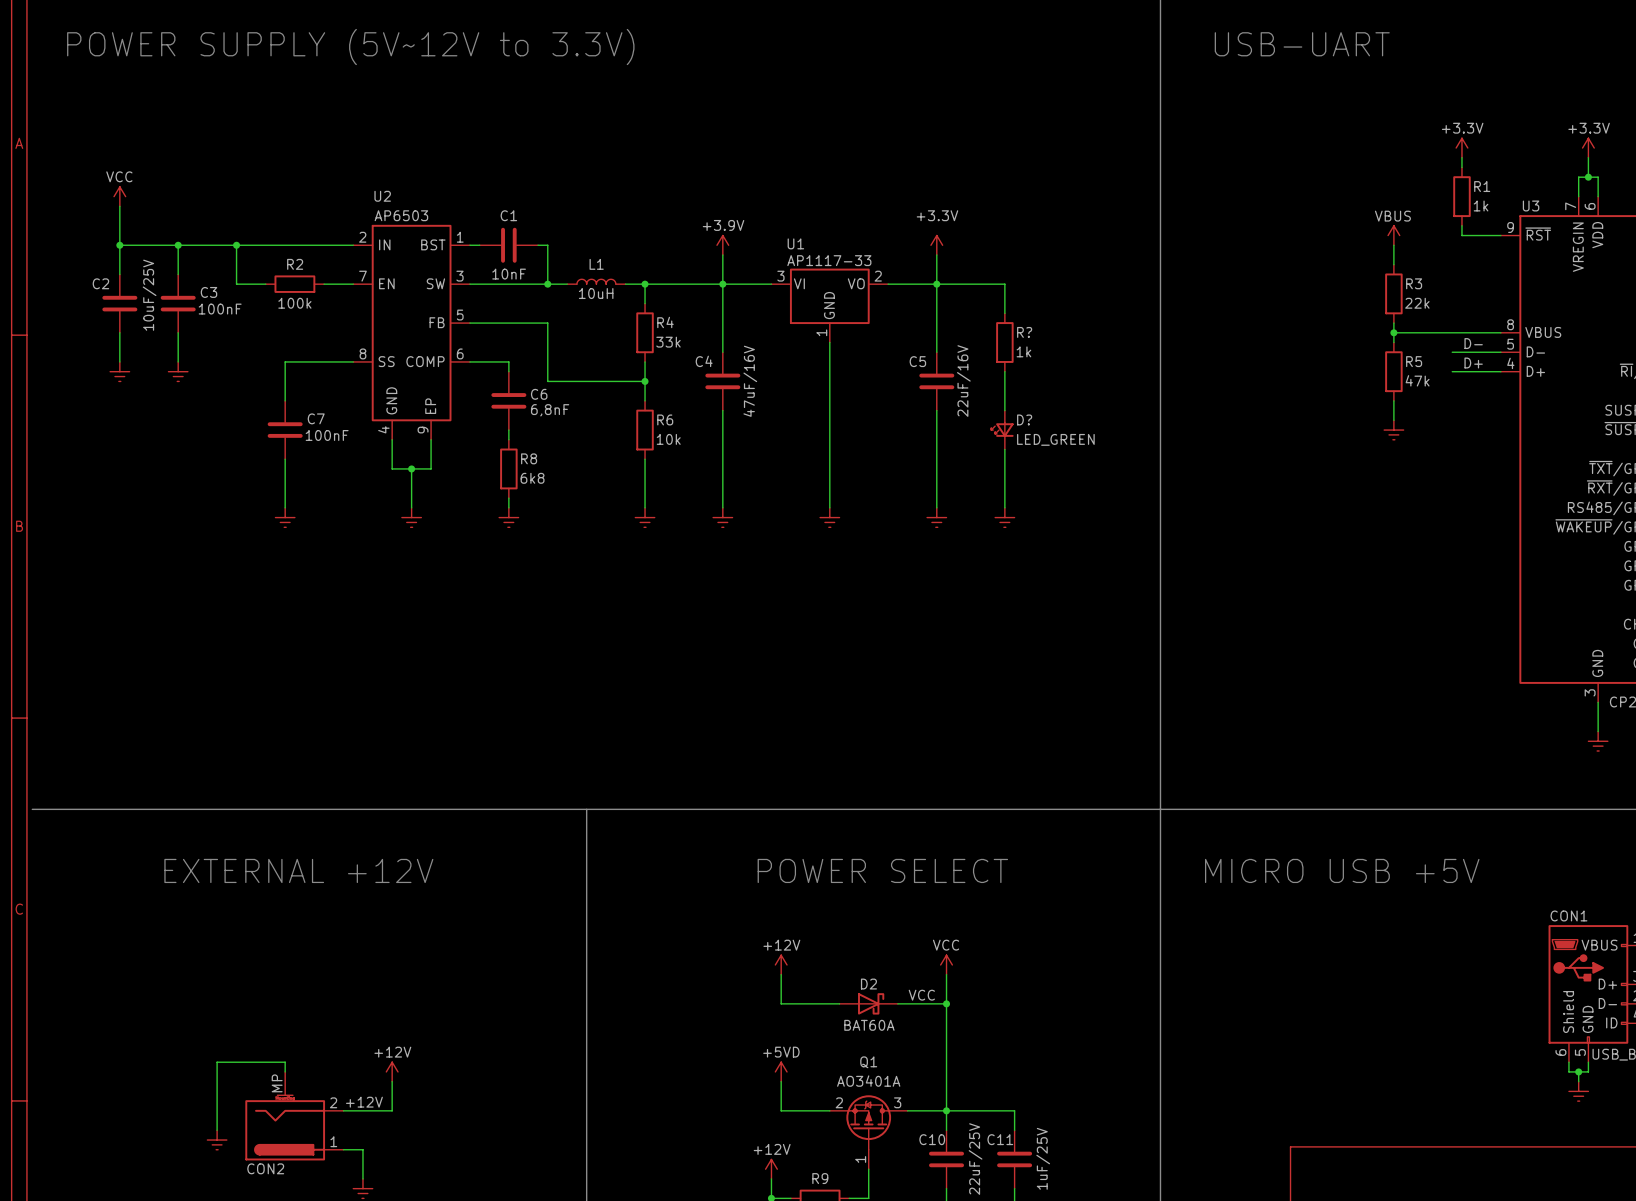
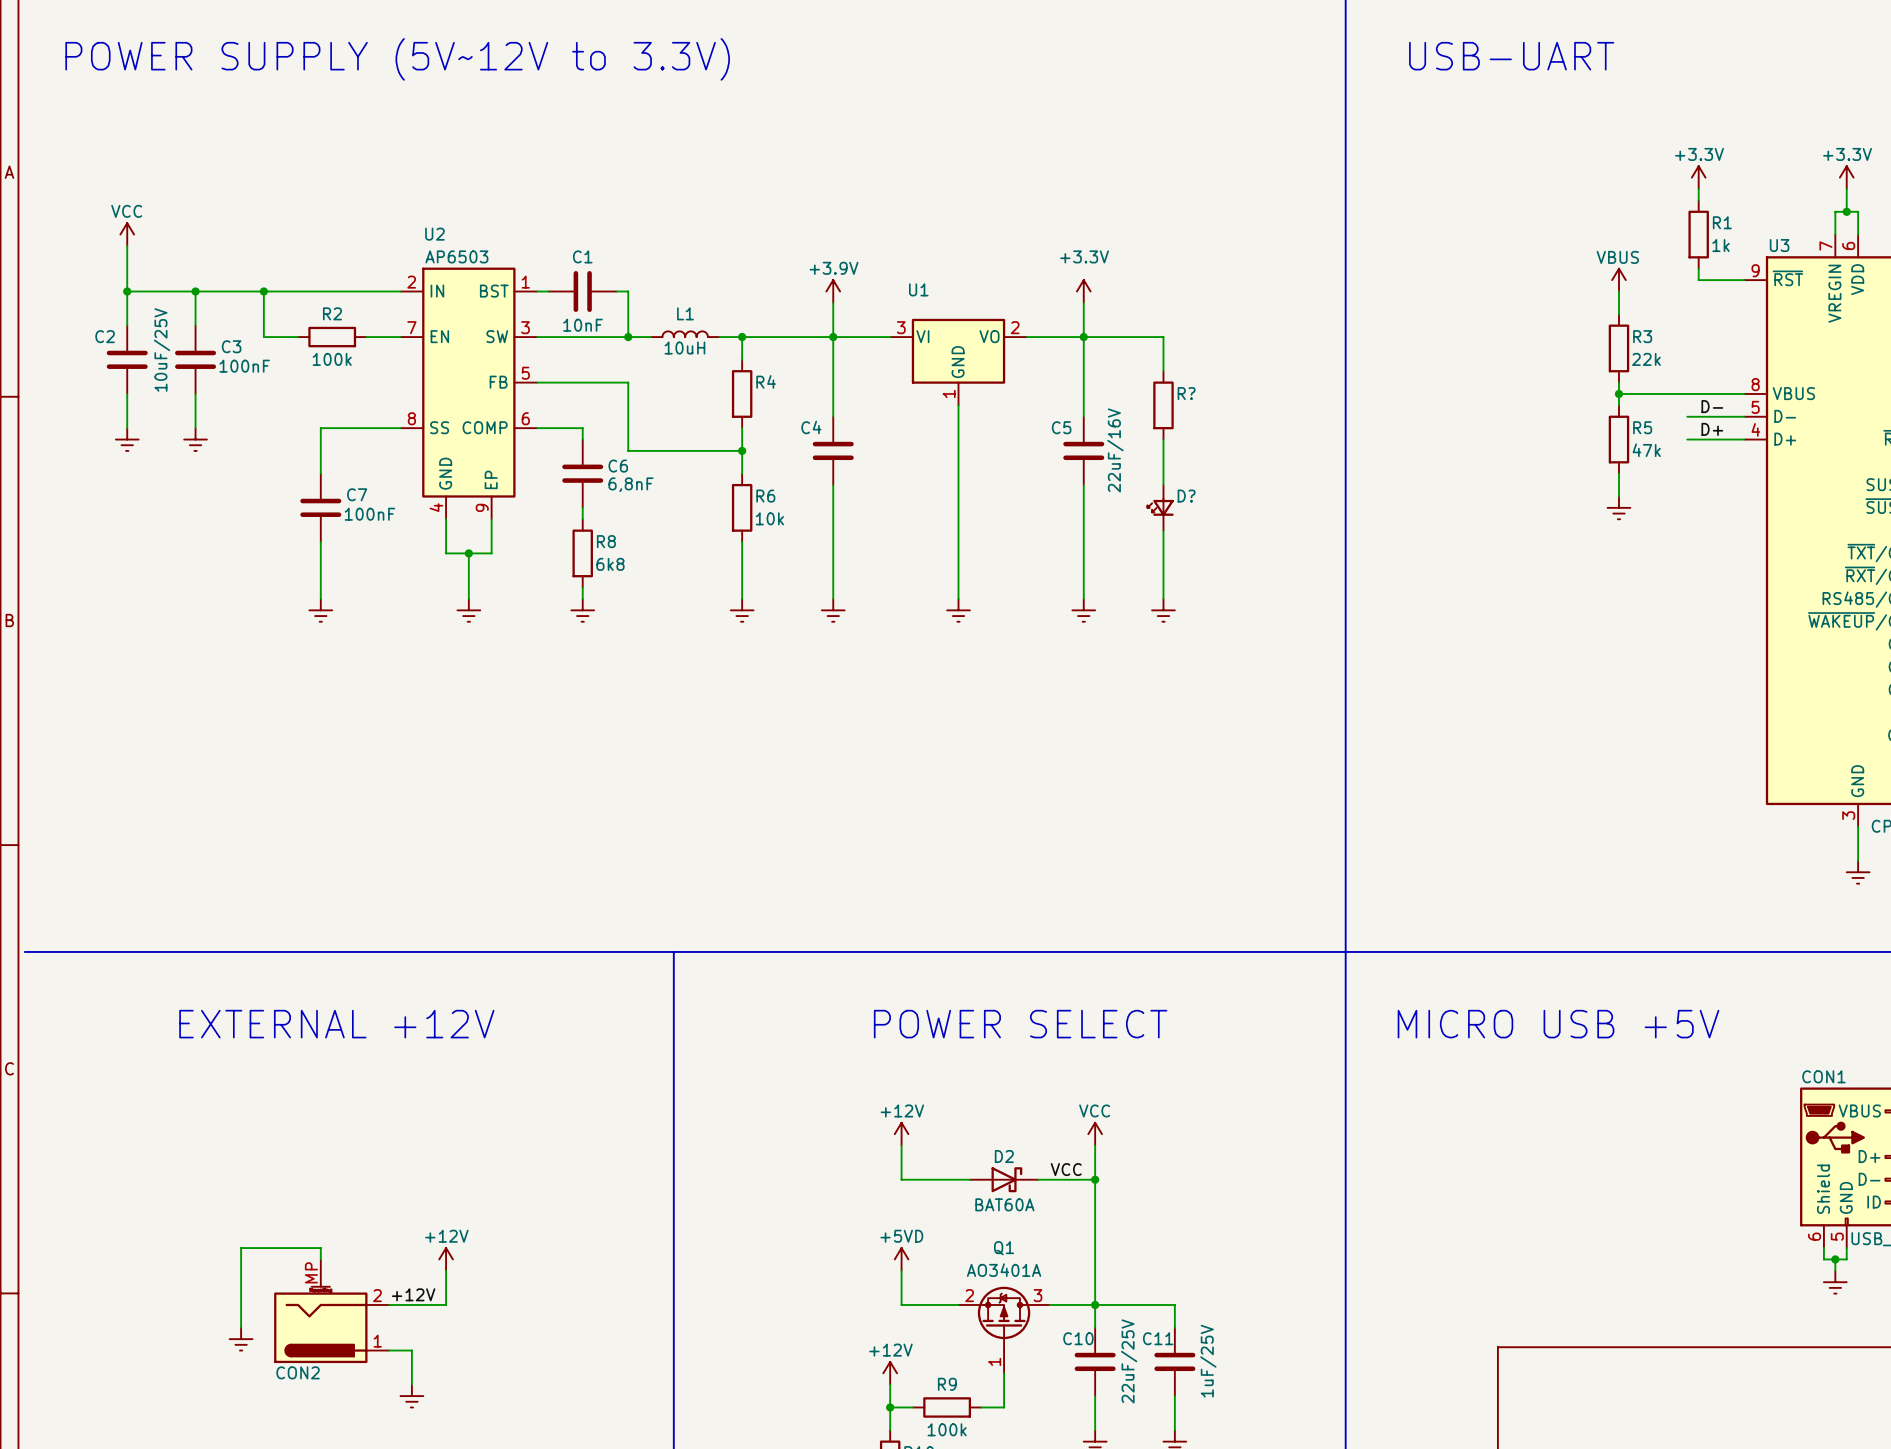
U1 value: AP1117-33 (829, 260) -> none
R4 value: 33k (668, 342) -> none
R? value: 1k (1023, 351) -> none
C4 value: 47uF/16V (750, 381) -> none
D? value: LED_GREEN (1055, 439) -> none

